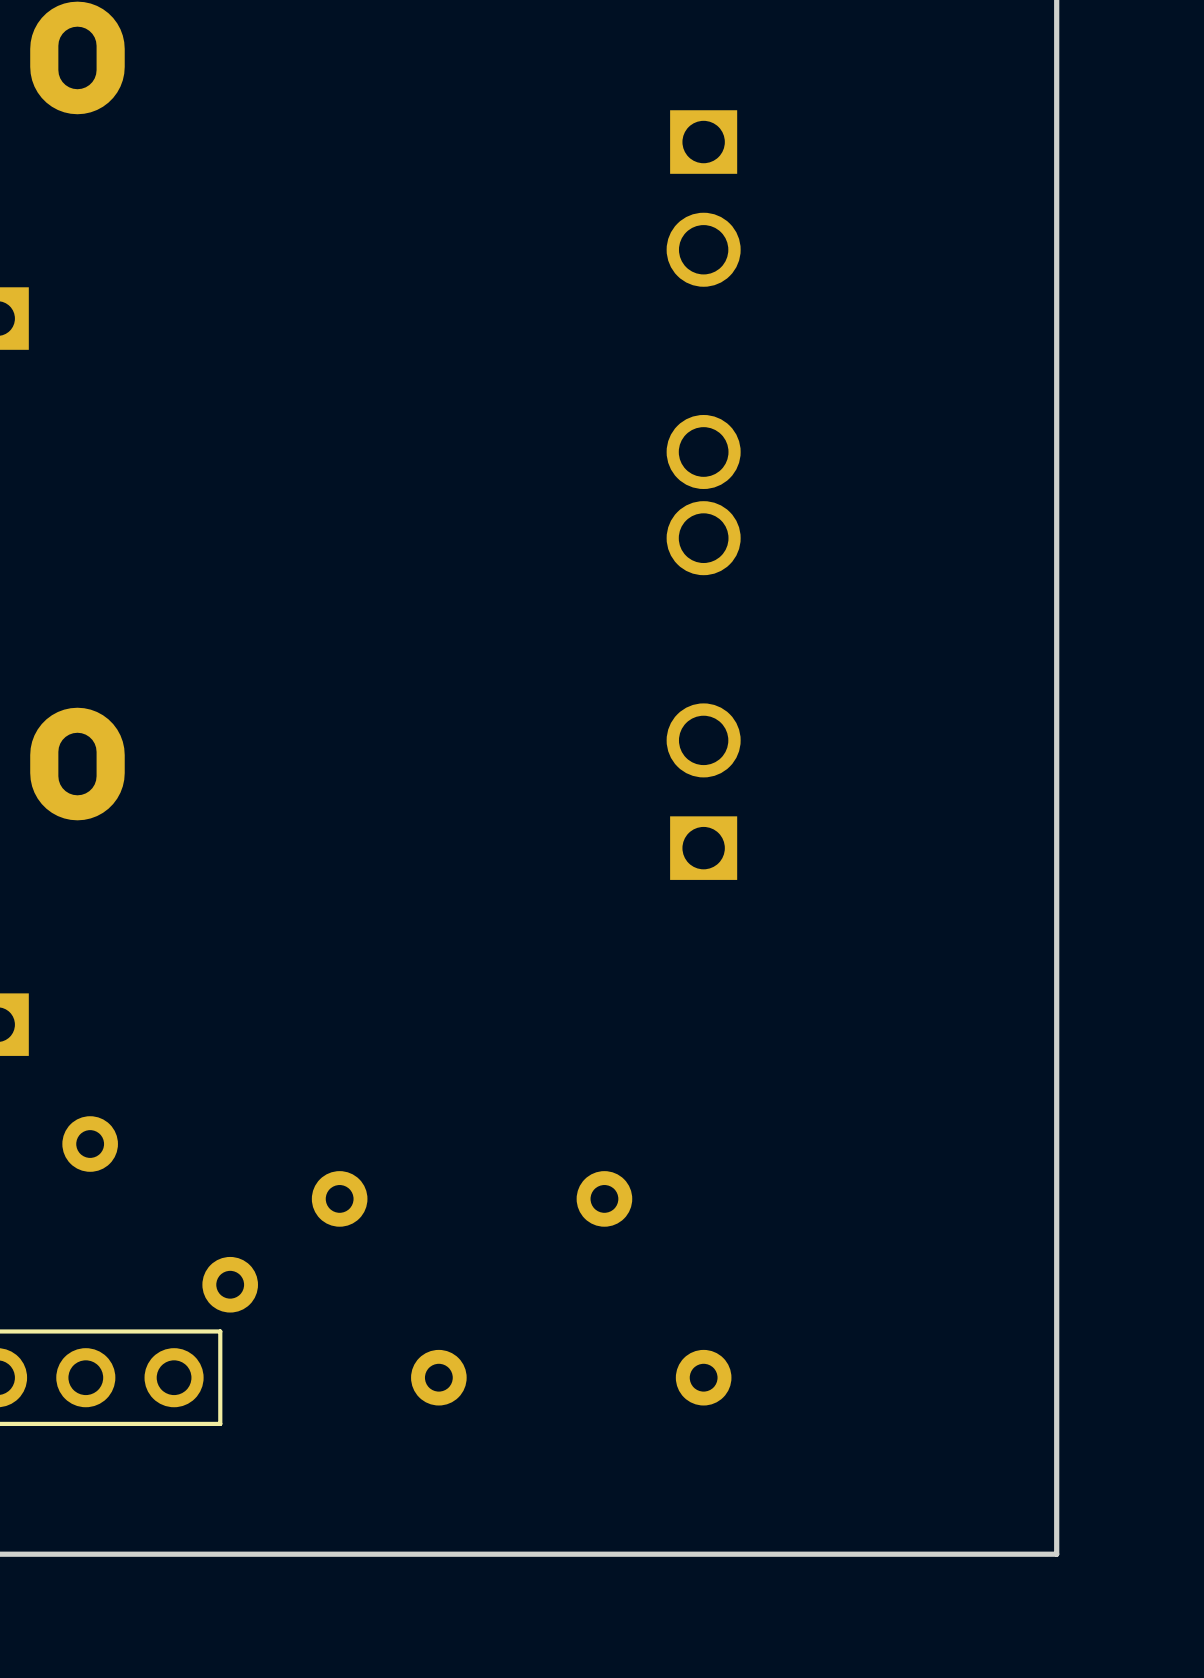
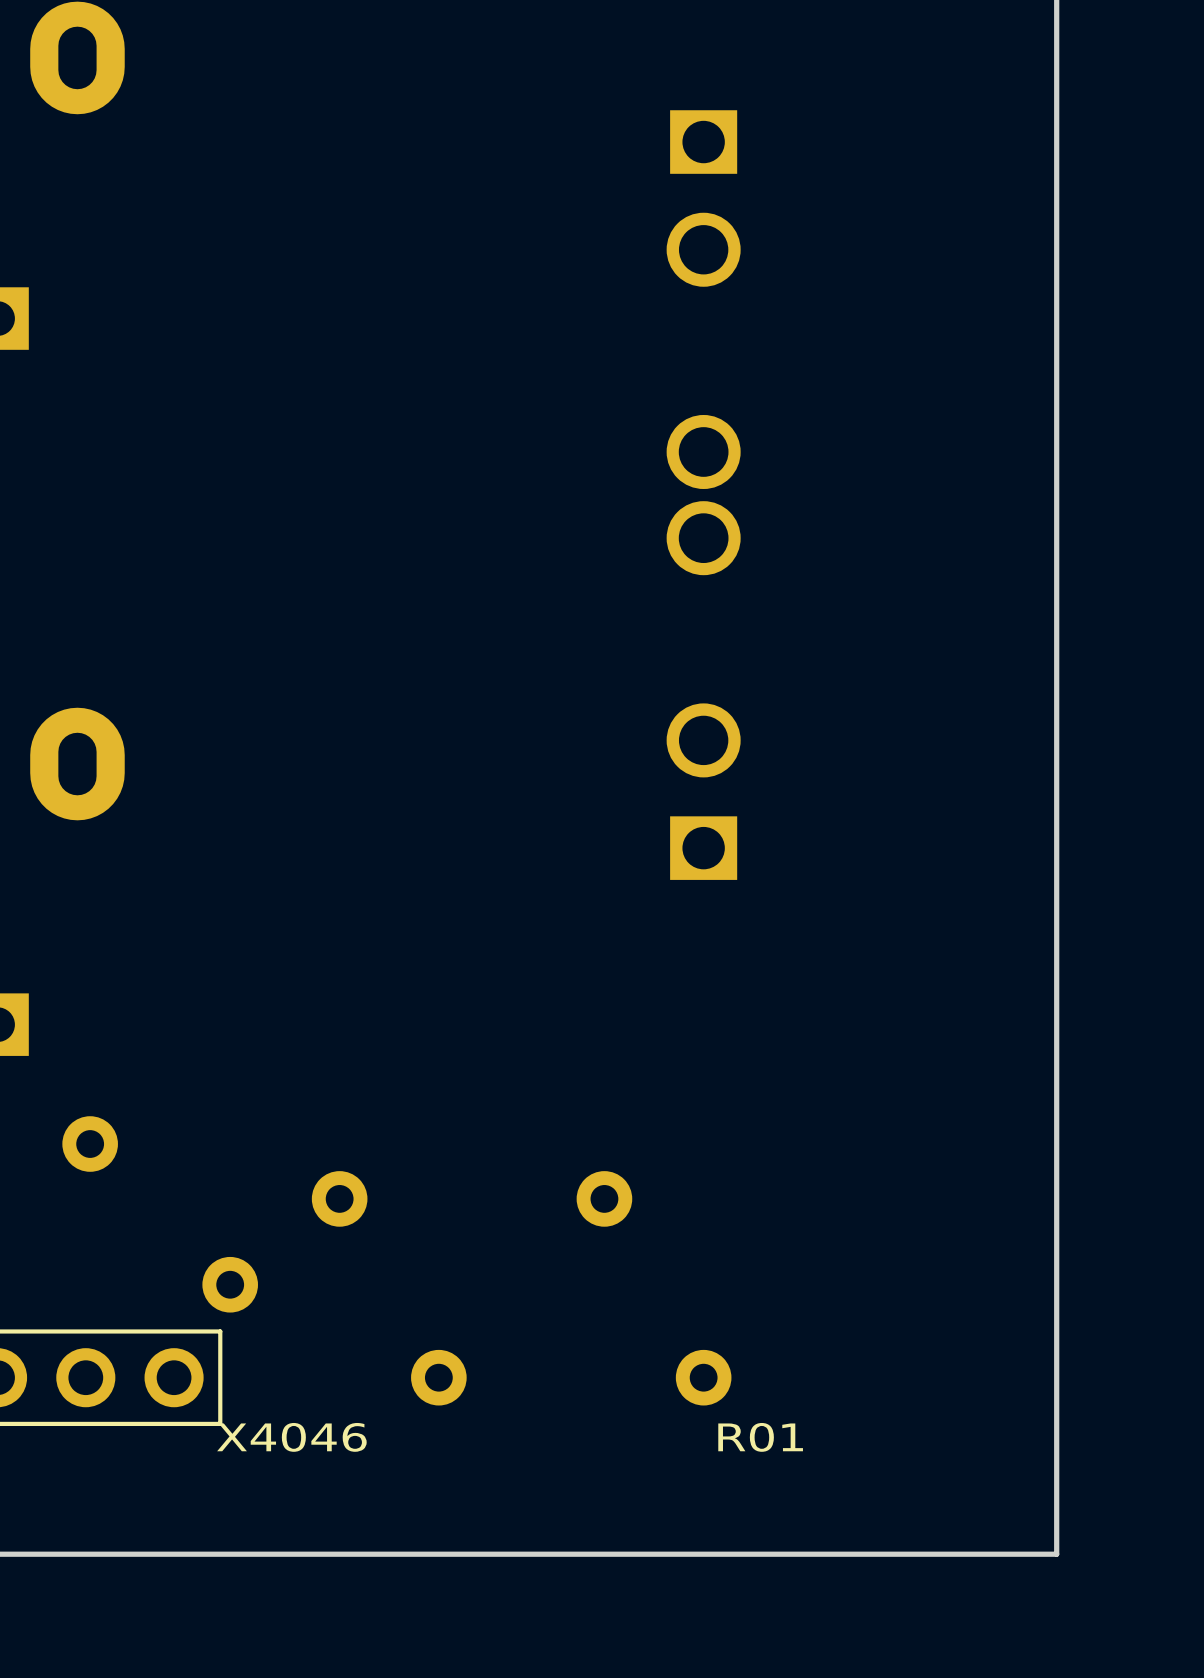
text: none -> X4046 (291, 1437)
text: none -> R01 (760, 1437)

